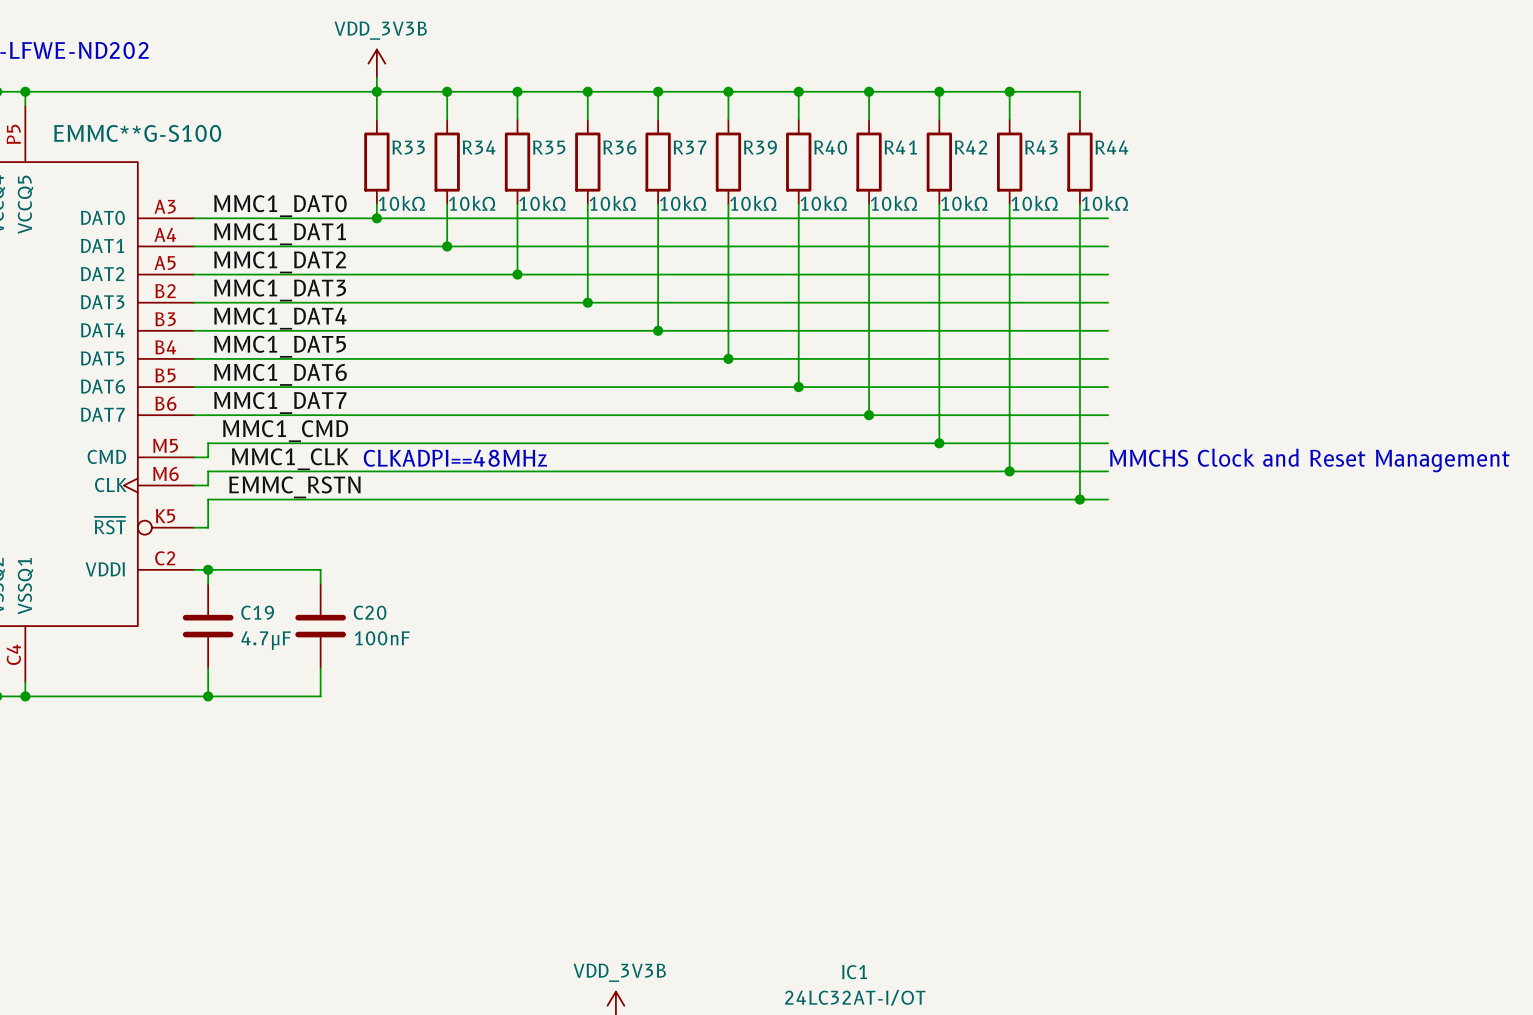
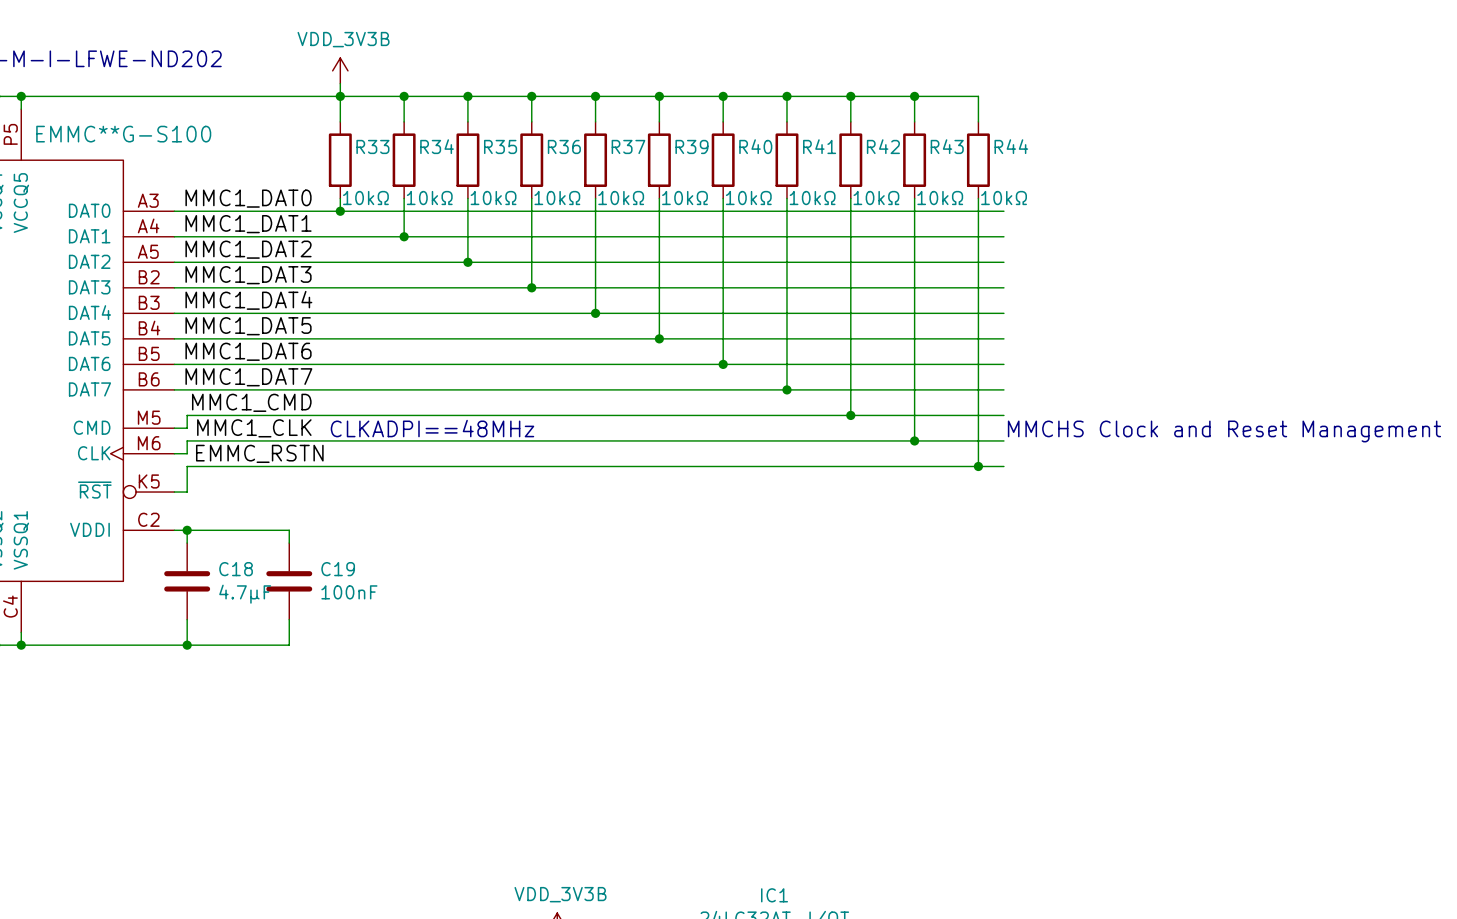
C19 name: C19 (257, 612) -> C18 (236, 569)
C20 name: C20 (370, 612) -> C19 (338, 569)

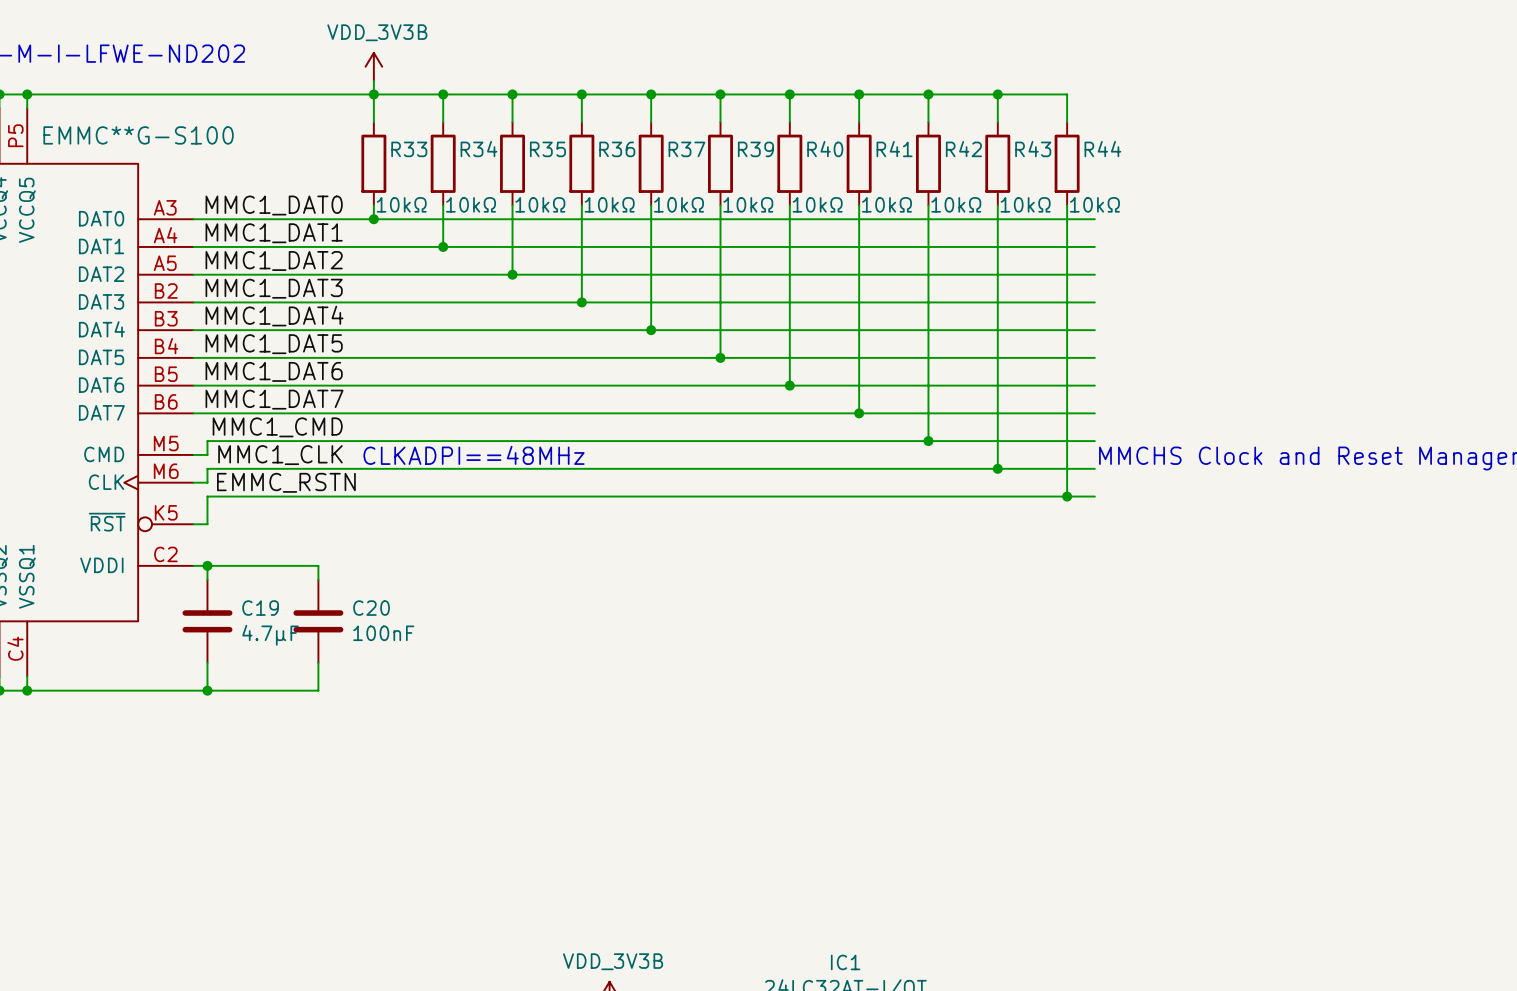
C18 name: C18 (236, 569) -> C19 (260, 608)
C19 name: C19 (338, 569) -> C20 (371, 608)

